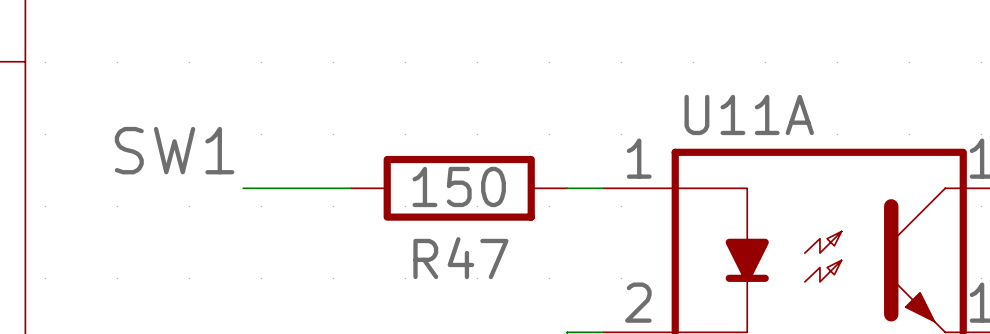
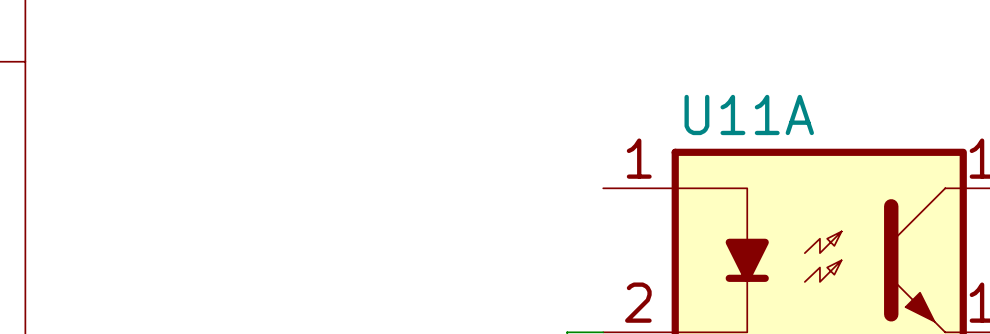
label: SW1 (174, 150) -> none
wire: (243, 188) (351, 188) -> none
R47: 150 (459, 188) -> none
wire: (567, 188) (603, 188) -> none

